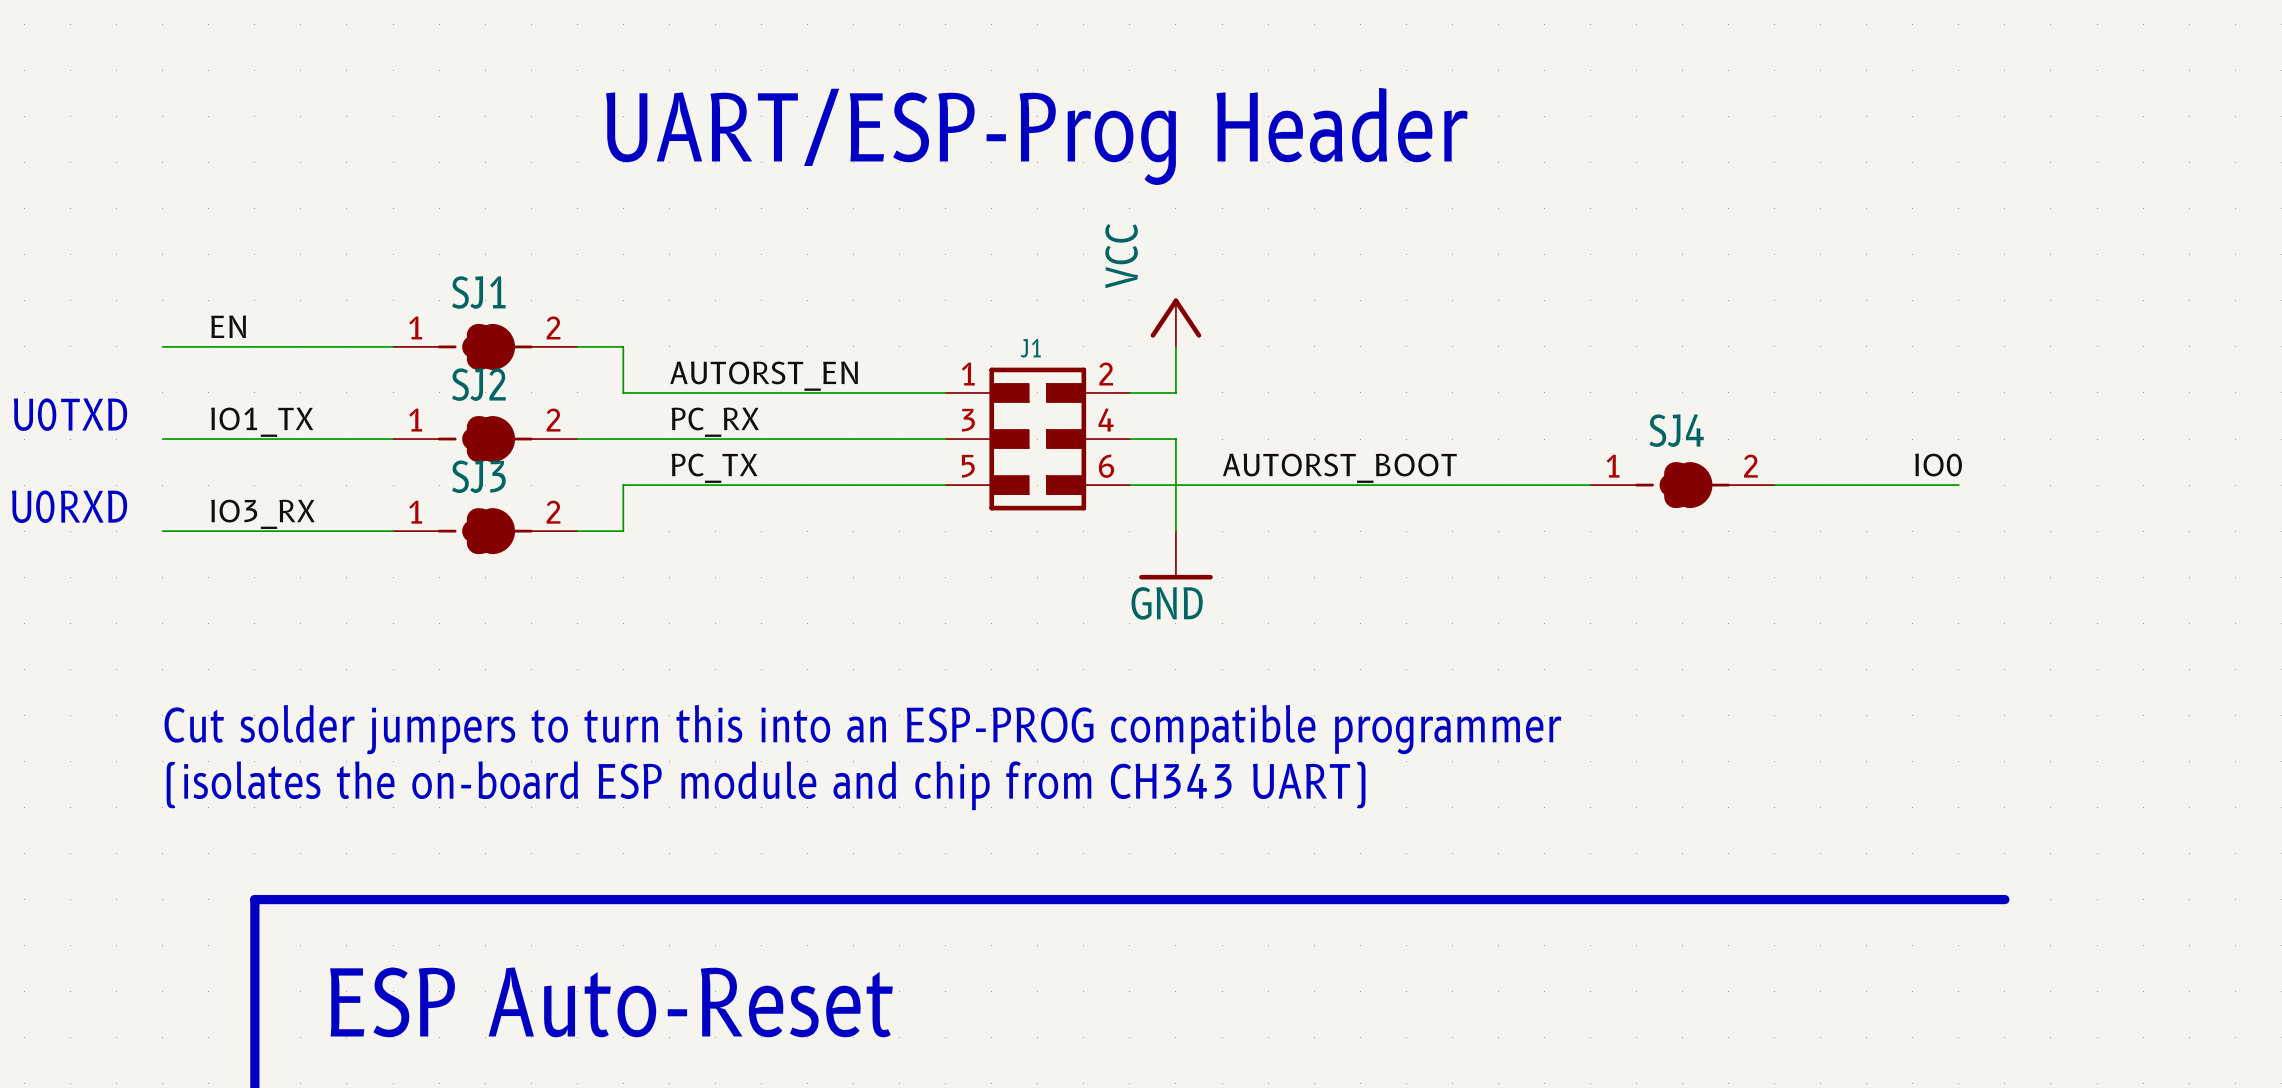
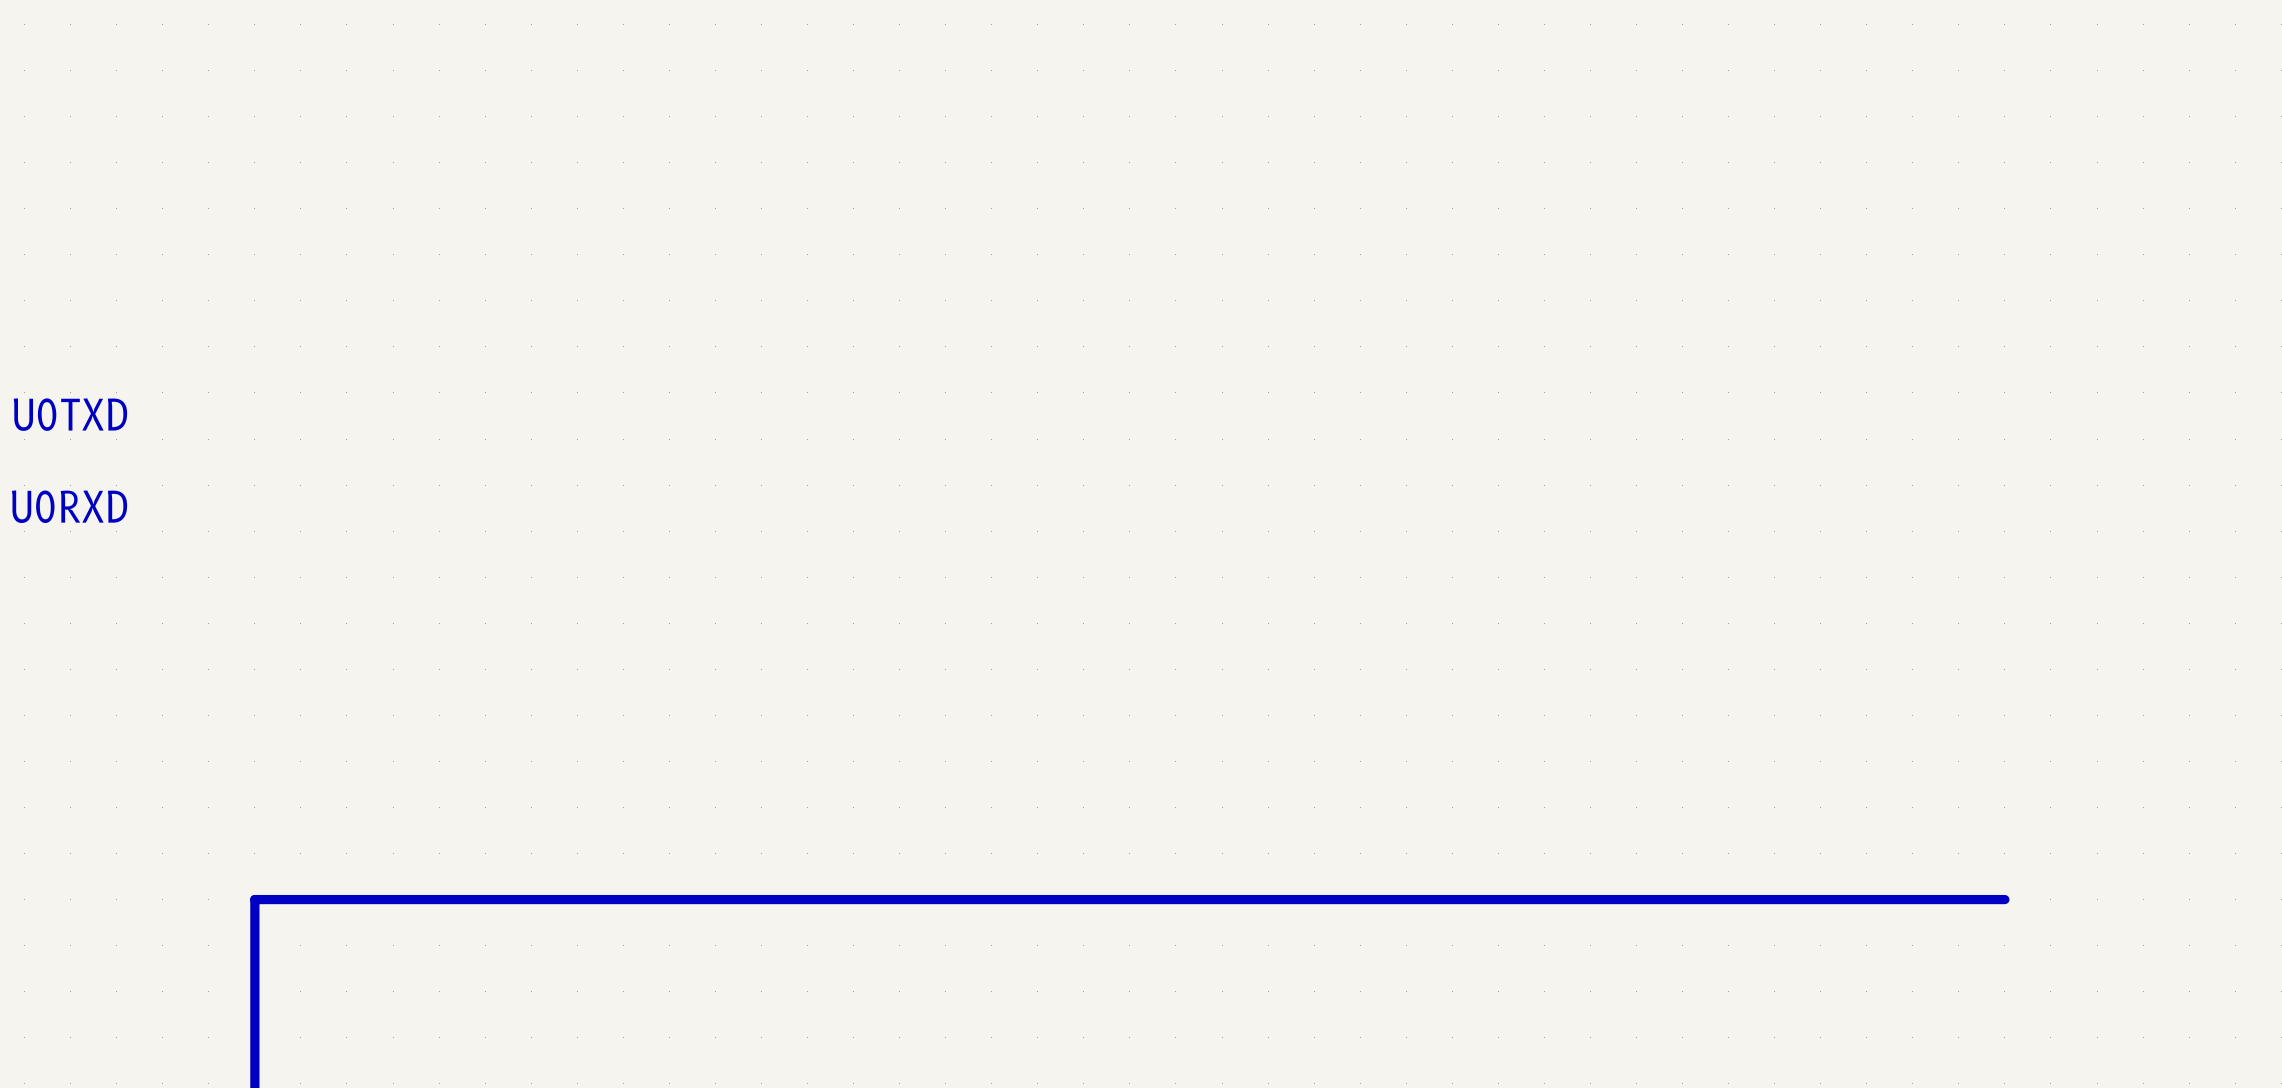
text: UART/ESP-Prog Header (1036, 136) -> none
power symbol: VCC (1175, 322) -> none
label: EN (228, 326) -> none
wire: (162, 346) (393, 346) -> none
SJ1: (485, 346) -> none
wire: (577, 346) (623, 346) (623, 392) (945, 392) -> none
wire: (1175, 346) (1175, 392) (1129, 392) -> none
label: AUTORST_EN (764, 376) -> none
label: IO1_TX (262, 422) -> none
label: PC_RX (715, 422) -> none
wire: (162, 439) (393, 439) -> none
SJ2: (485, 439) -> none
wire: (577, 439) (945, 439) -> none
J1: (1037, 439) -> none
wire: (1129, 439) (1175, 439) (1175, 531) -> none
label: IO0 (1938, 465) -> none
label: PC_TX (714, 468) -> none
label: AUTORST_BOOT (1339, 468) -> none
wire: (945, 485) (623, 485) (623, 531) (577, 531) -> none
wire: (1129, 485) (1590, 485) -> none
SJ4: (1682, 485) -> none
wire: (1774, 485) (1958, 485) -> none
label: IO3_RX (262, 514) -> none
wire: (162, 531) (393, 531) -> none
SJ3: (485, 531) -> none
power symbol: GND (1175, 555) -> none
text: Cut solder jumpers to turn this into an ESP-PROG compatible programmer (862, 729) -> none
text: (isolates the on-board ESP module and chip from CH343 UART) (766, 785) -> none
text: ESP Auto-Reset (611, 1002) -> none

